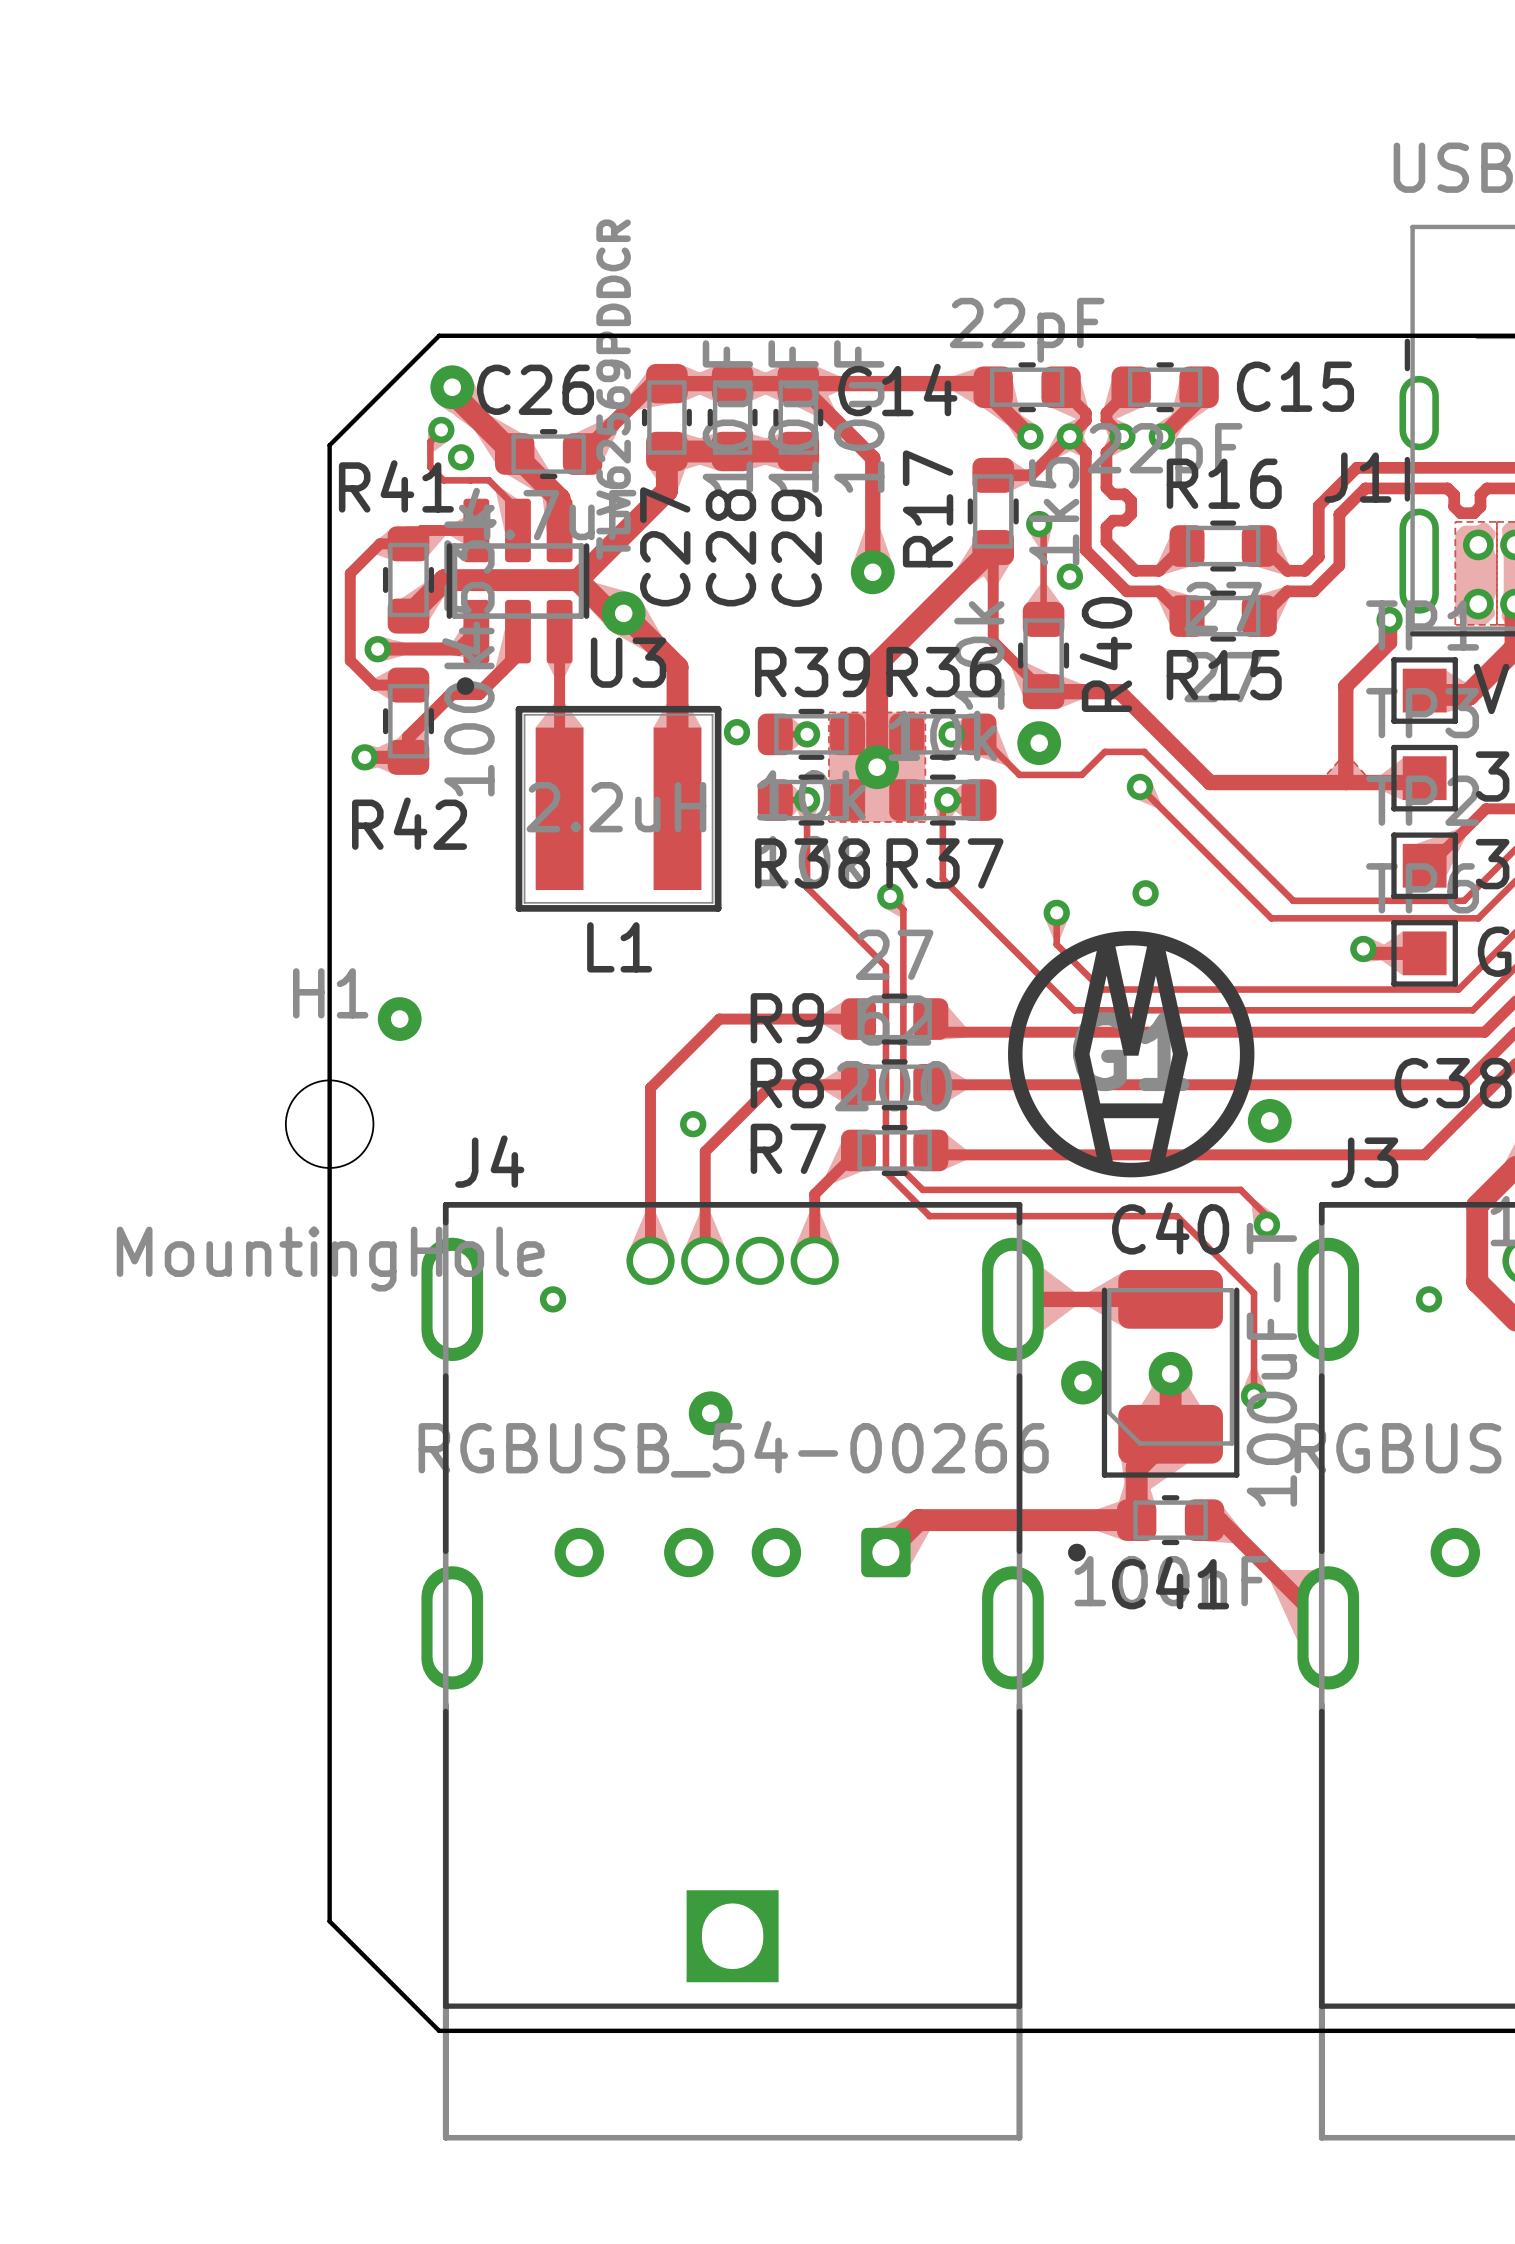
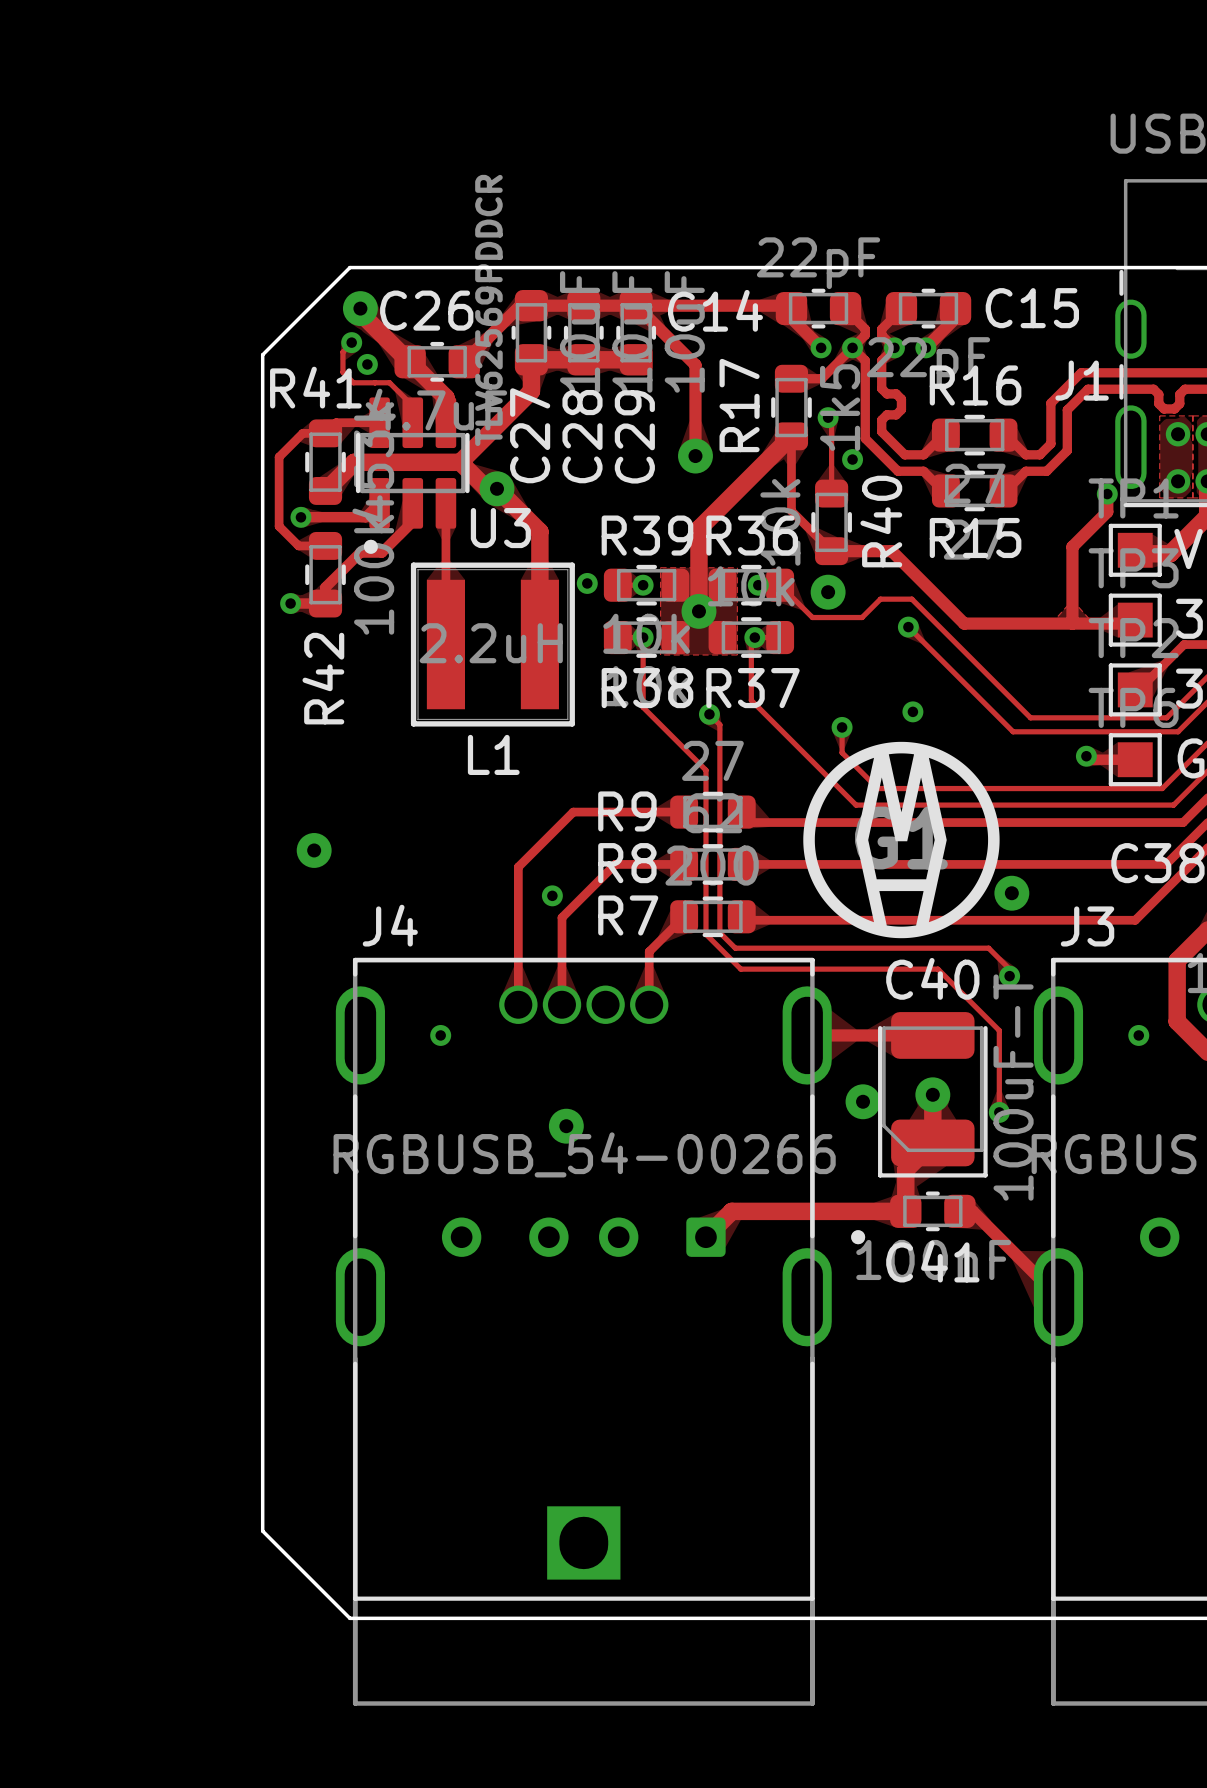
R42 name rotation: 0° (409, 823) -> 90° counterclockwise (323, 678)
via position: (399, 1019) -> (314, 850)
H1: MountingHole (329, 1124) -> none

